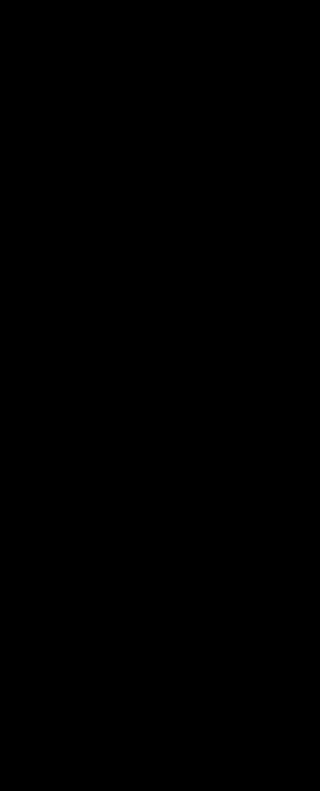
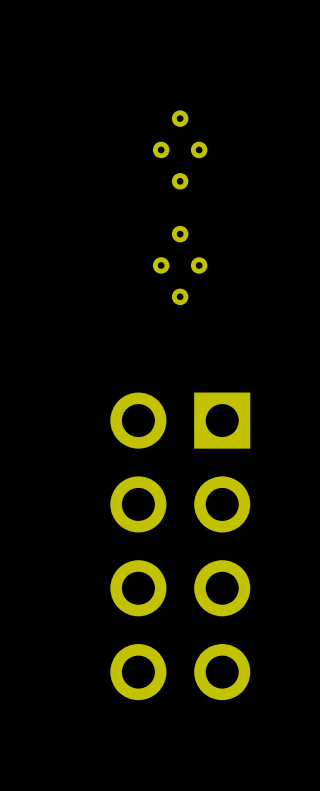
part: none -> (180, 149)
part: none -> (180, 265)
part: none -> (180, 546)

